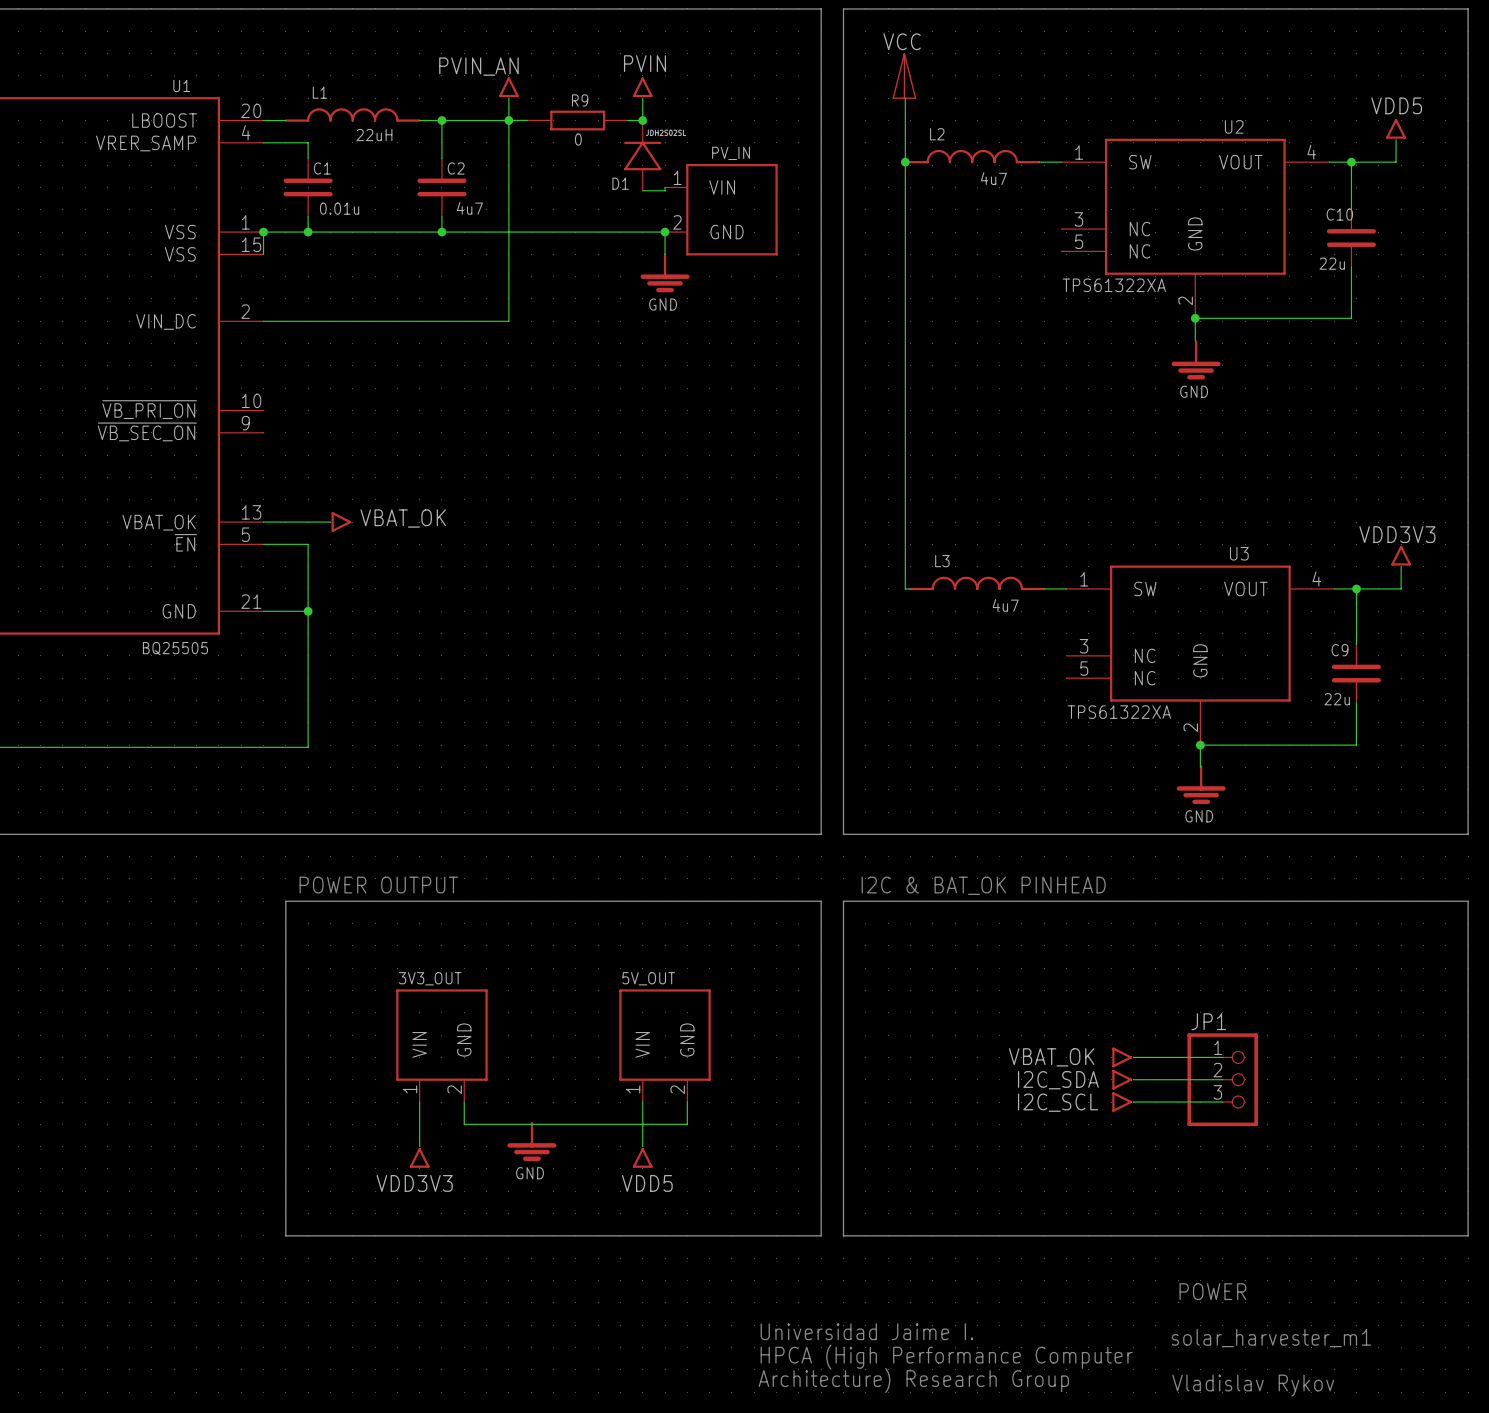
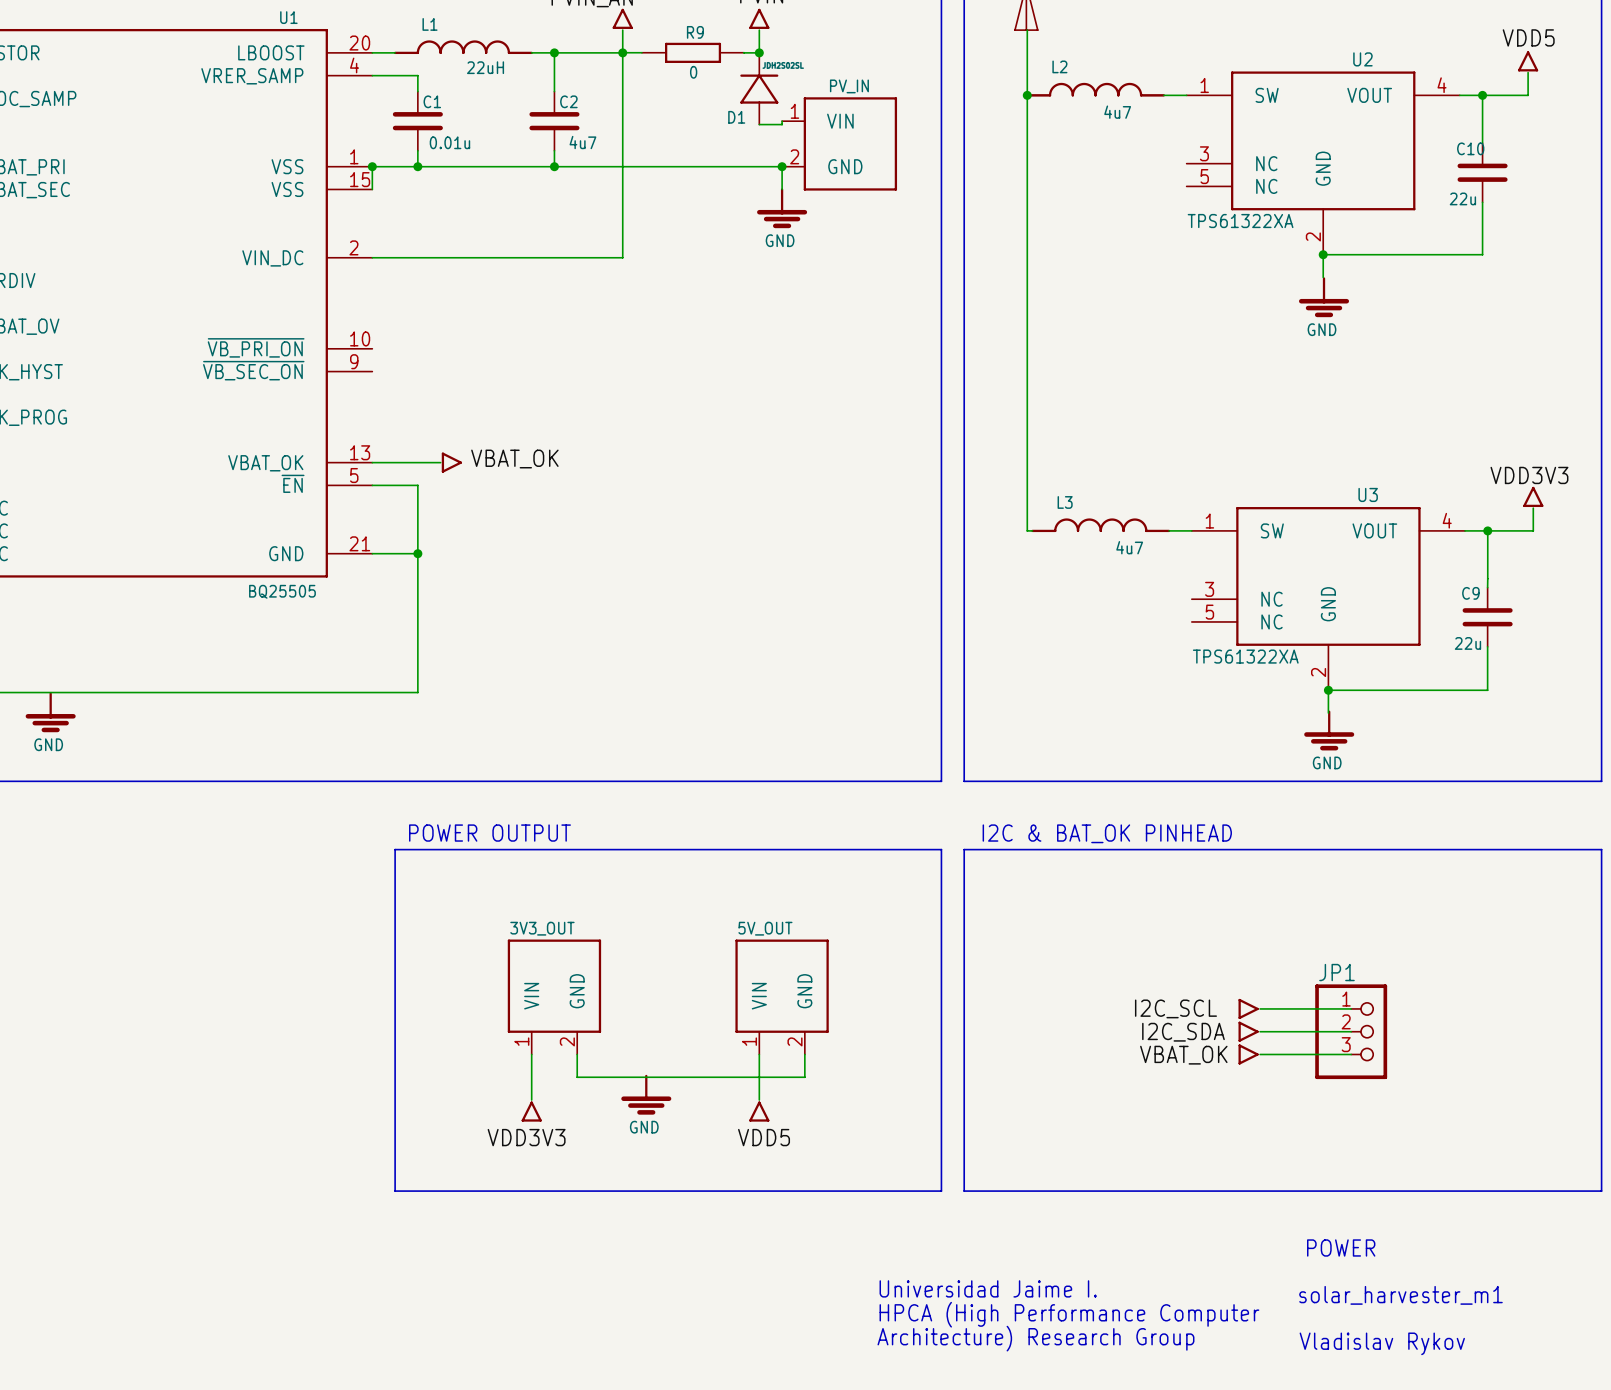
label: VBAT_OK (1051, 1057) -> I2C_SCL (1175, 1008)
label: I2C_SCL (1058, 1102) -> VBAT_OK (1183, 1055)

